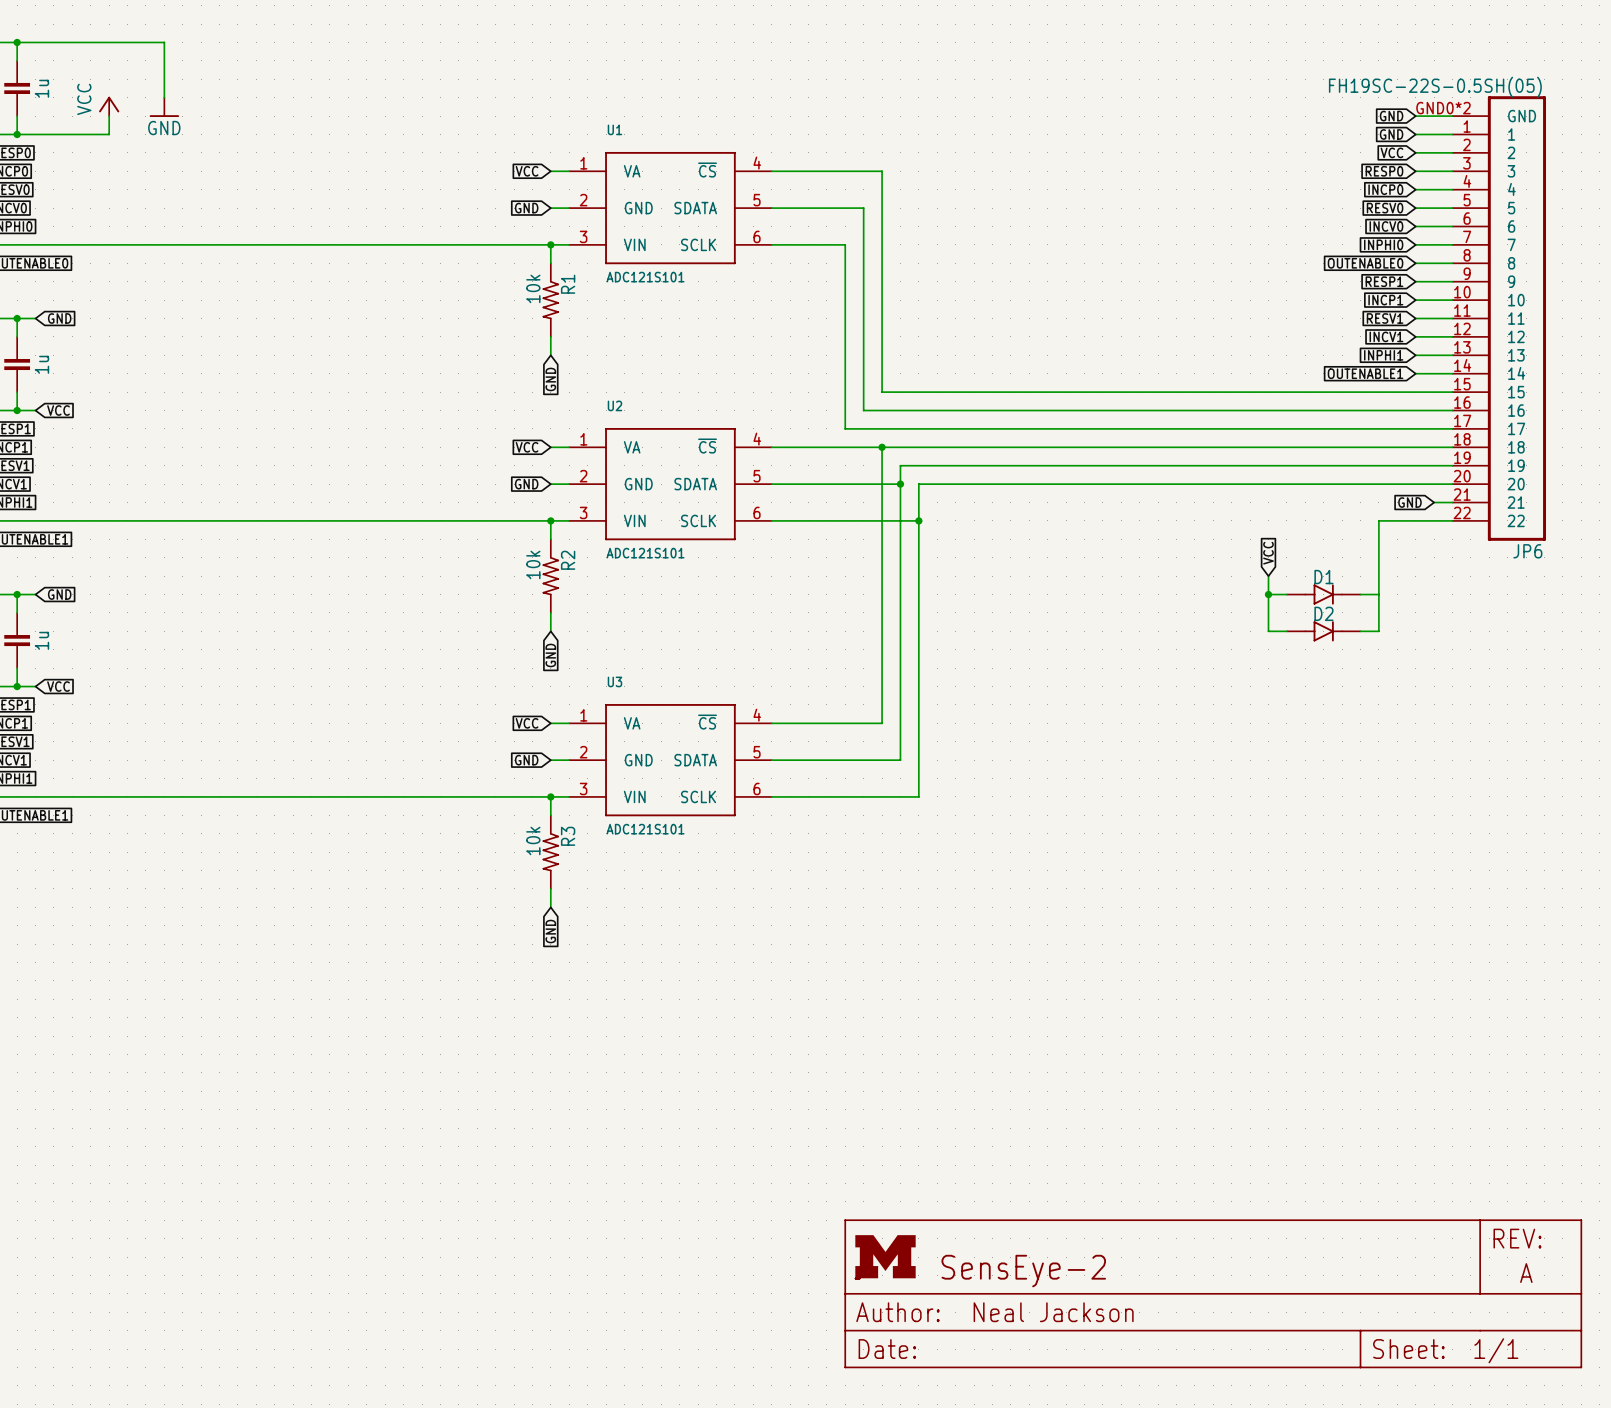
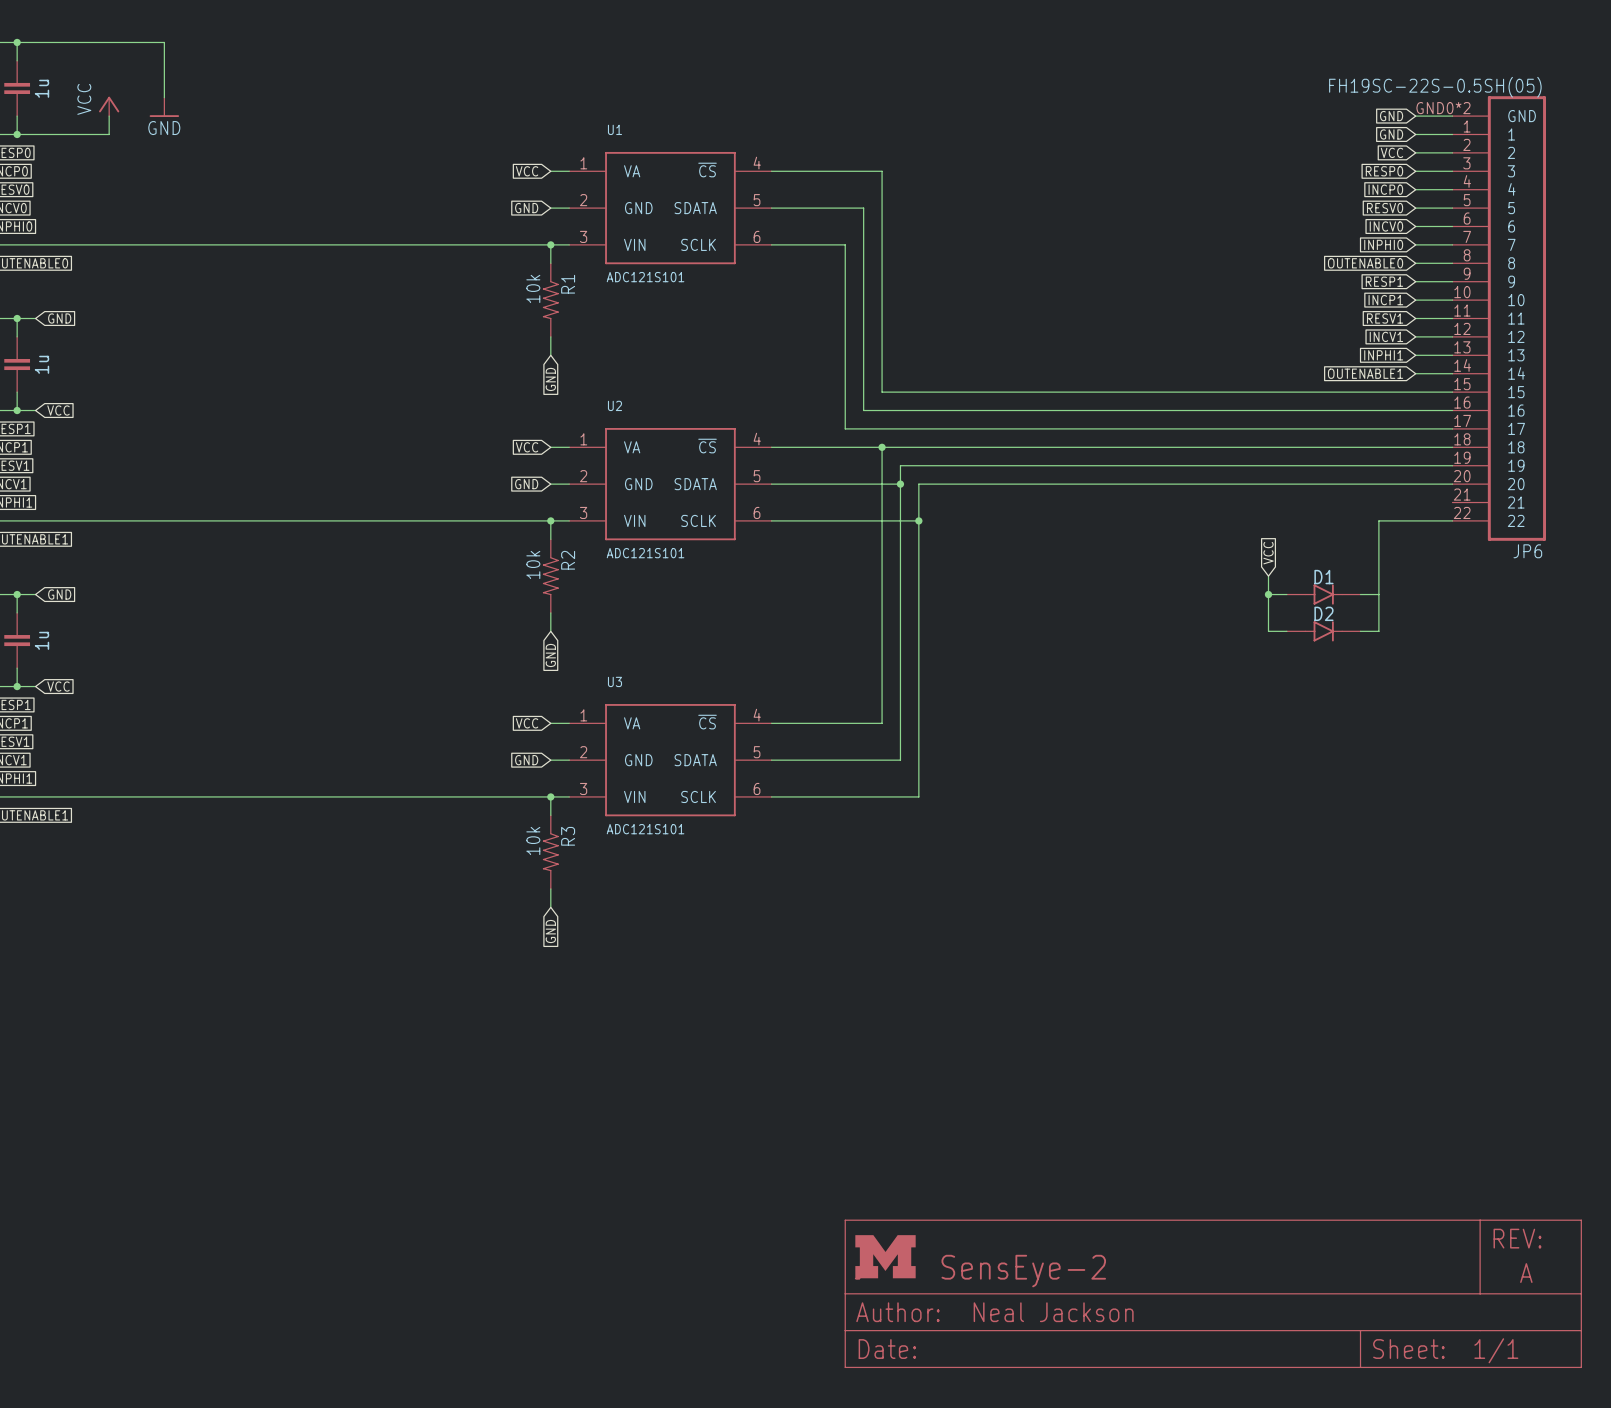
global label: GND (1409, 502) -> none
wire: (1434, 502) (1452, 502) -> none

